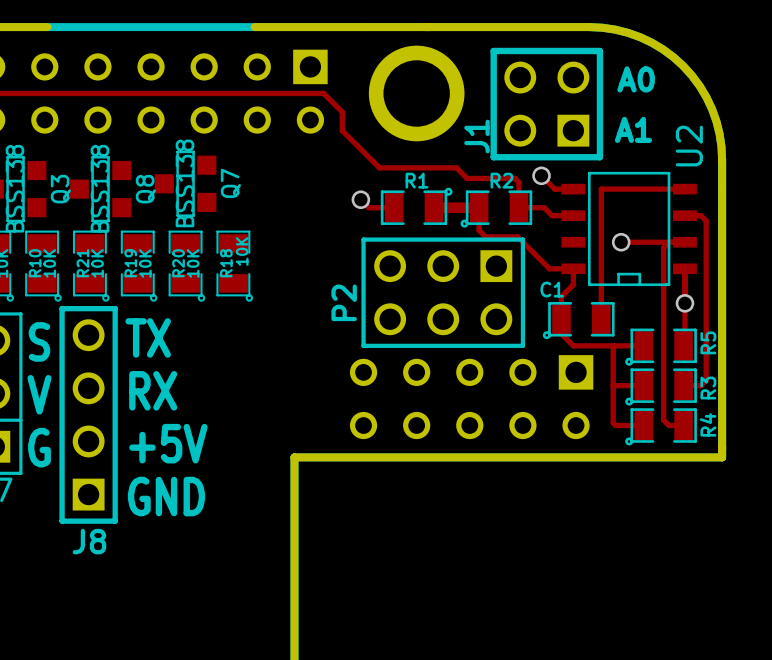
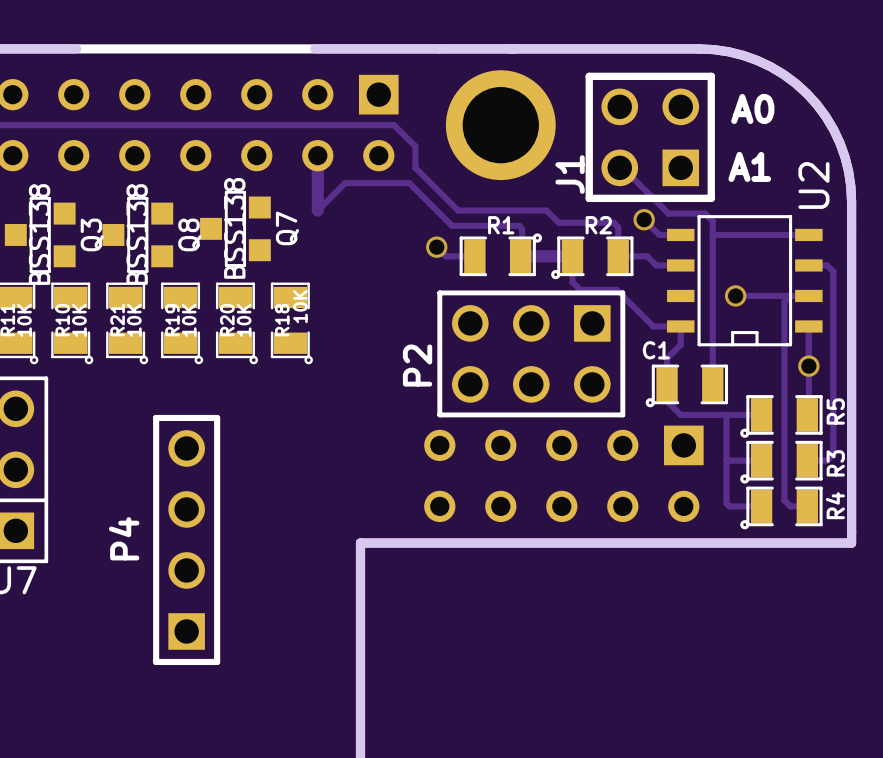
track: none -> (317, 155) (317, 210) (345, 183) (409, 183) (452, 225) (519, 225) (522, 228) (520, 256)
track: none -> (619, 167) (622, 167) (668, 213) (705, 213) (712, 221) (712, 234)
text: TX (148, 337) -> none
text: S (39, 341) -> none
text: RX (153, 390) -> none
text: V (39, 394) -> none
J8: (88, 414) -> none
text: +5V (168, 443) -> none
text: G (39, 447) -> none
P4: none -> (186, 539)
text: GND (166, 496) -> none

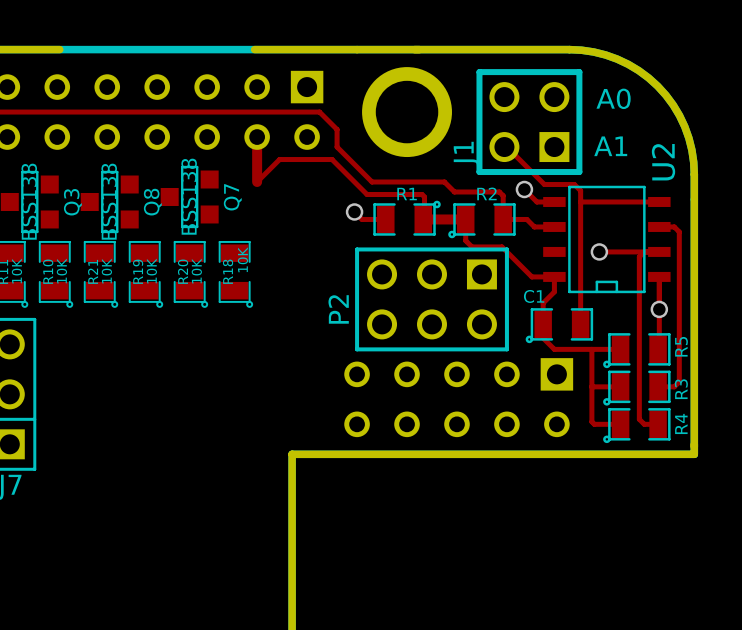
P4: (186, 539) -> none

